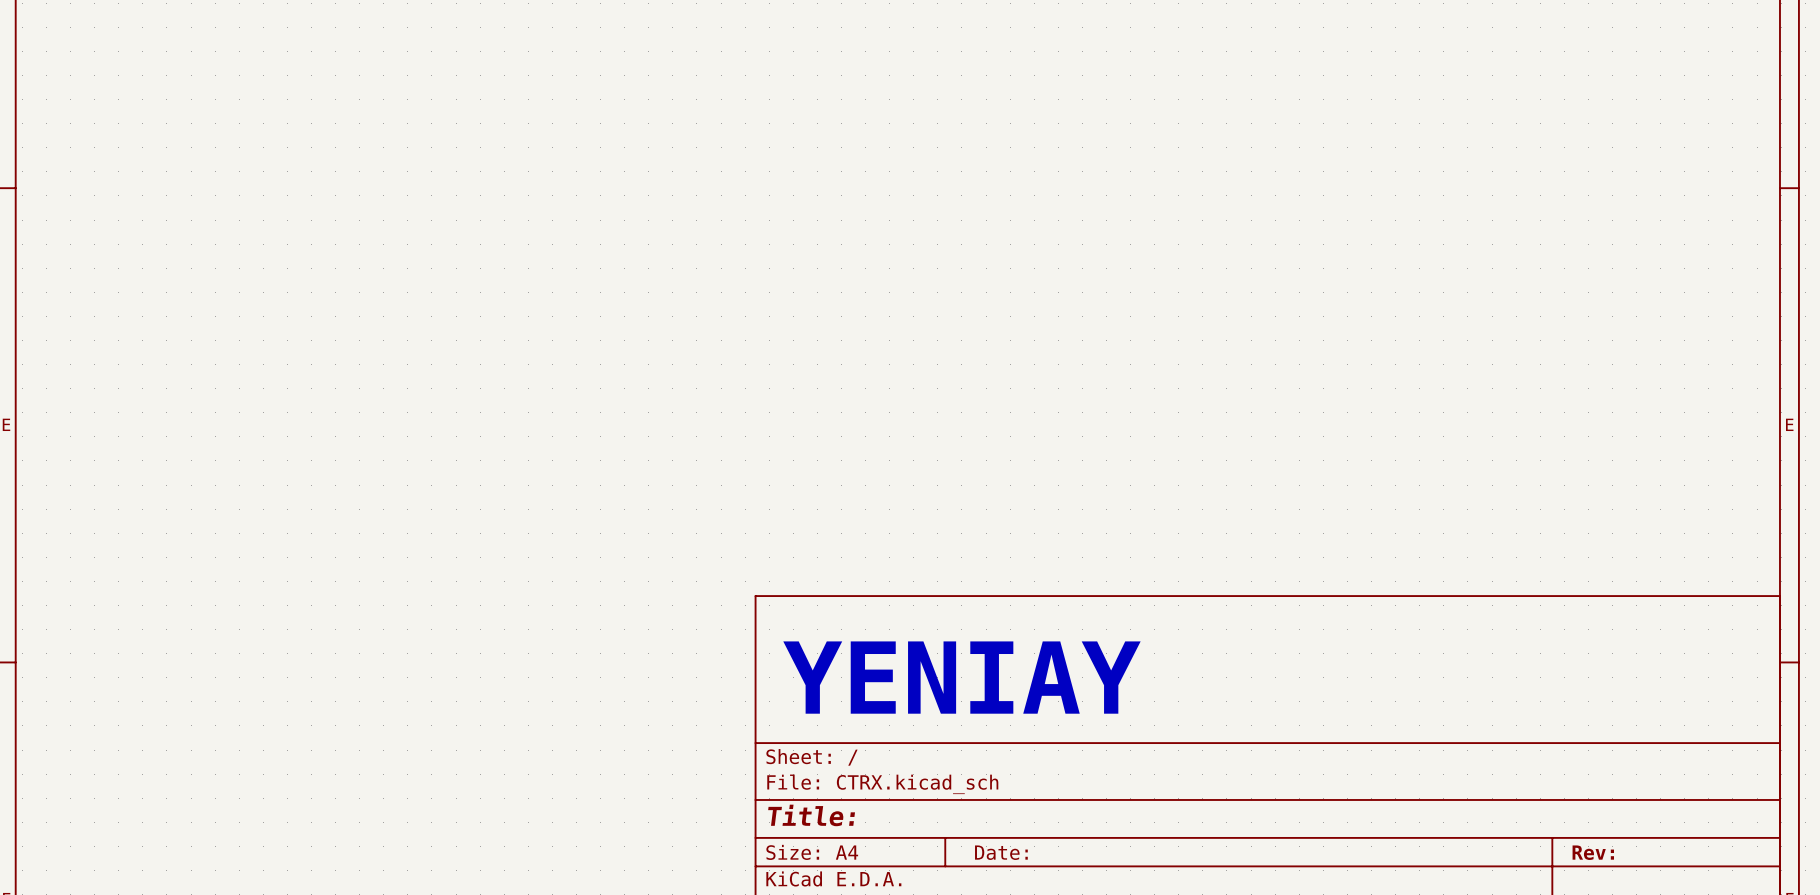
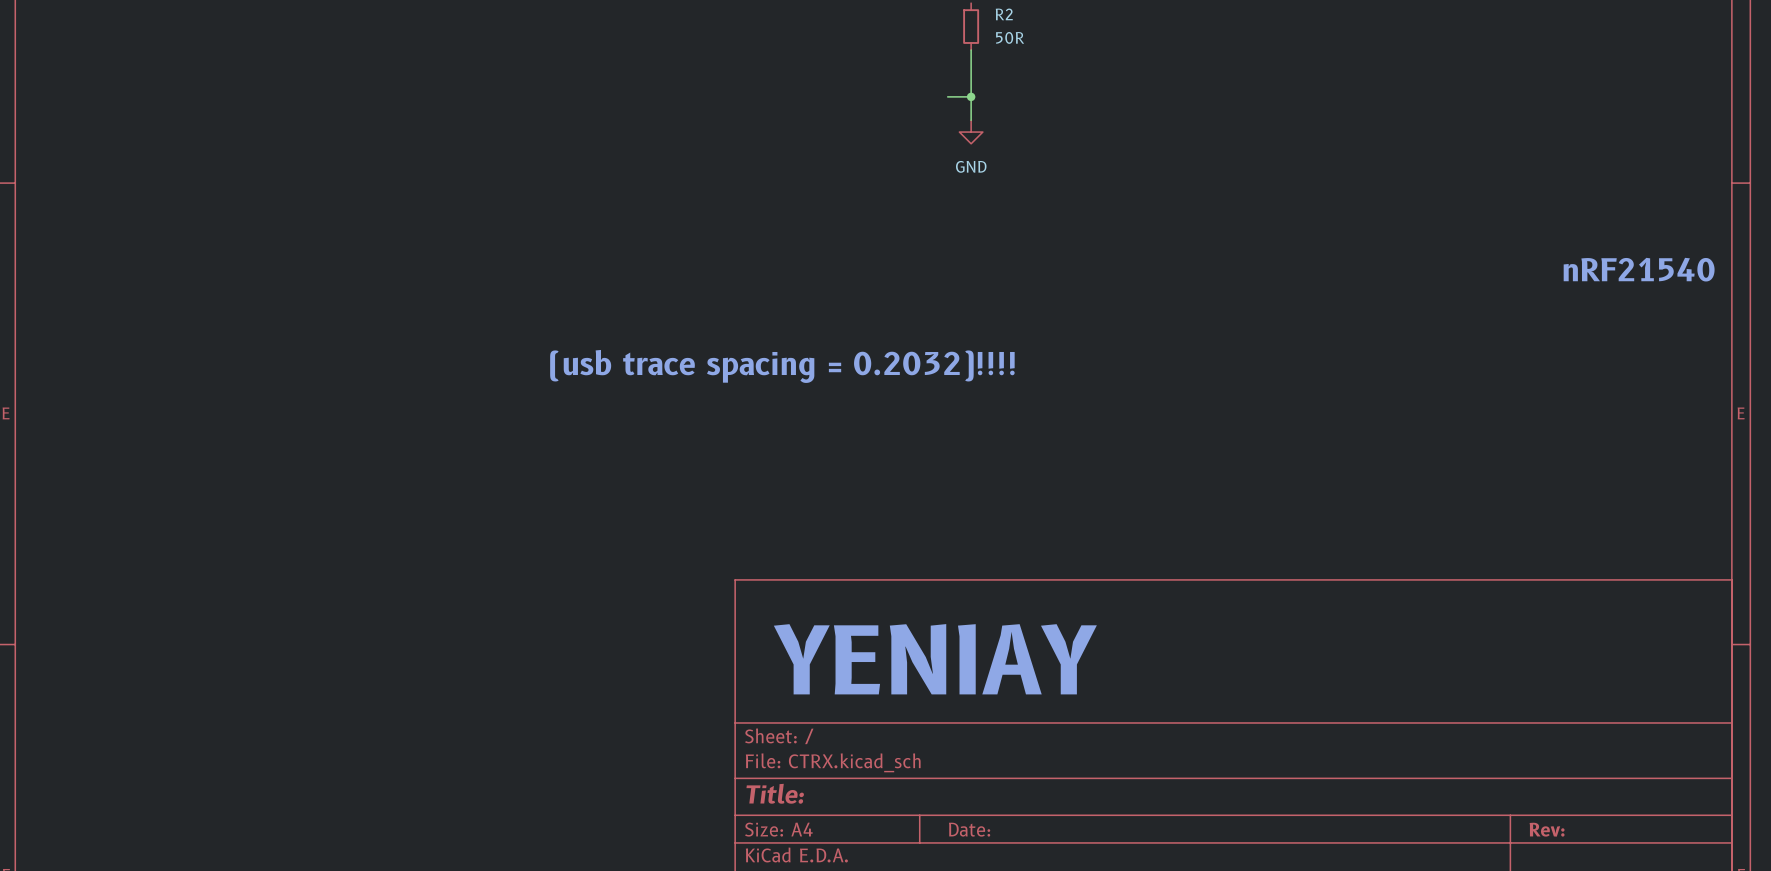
R2: none -> 50R (971, 26)
wire: none -> (971, 50) (971, 120)
wire: none -> (947, 96) (971, 96)
junction: none -> (971, 96)
power symbol: none -> GND (971, 132)
text: none -> nRF21540 (1639, 269)
text: none -> (usb trace spacing = 0.2032)!!!! (782, 366)

